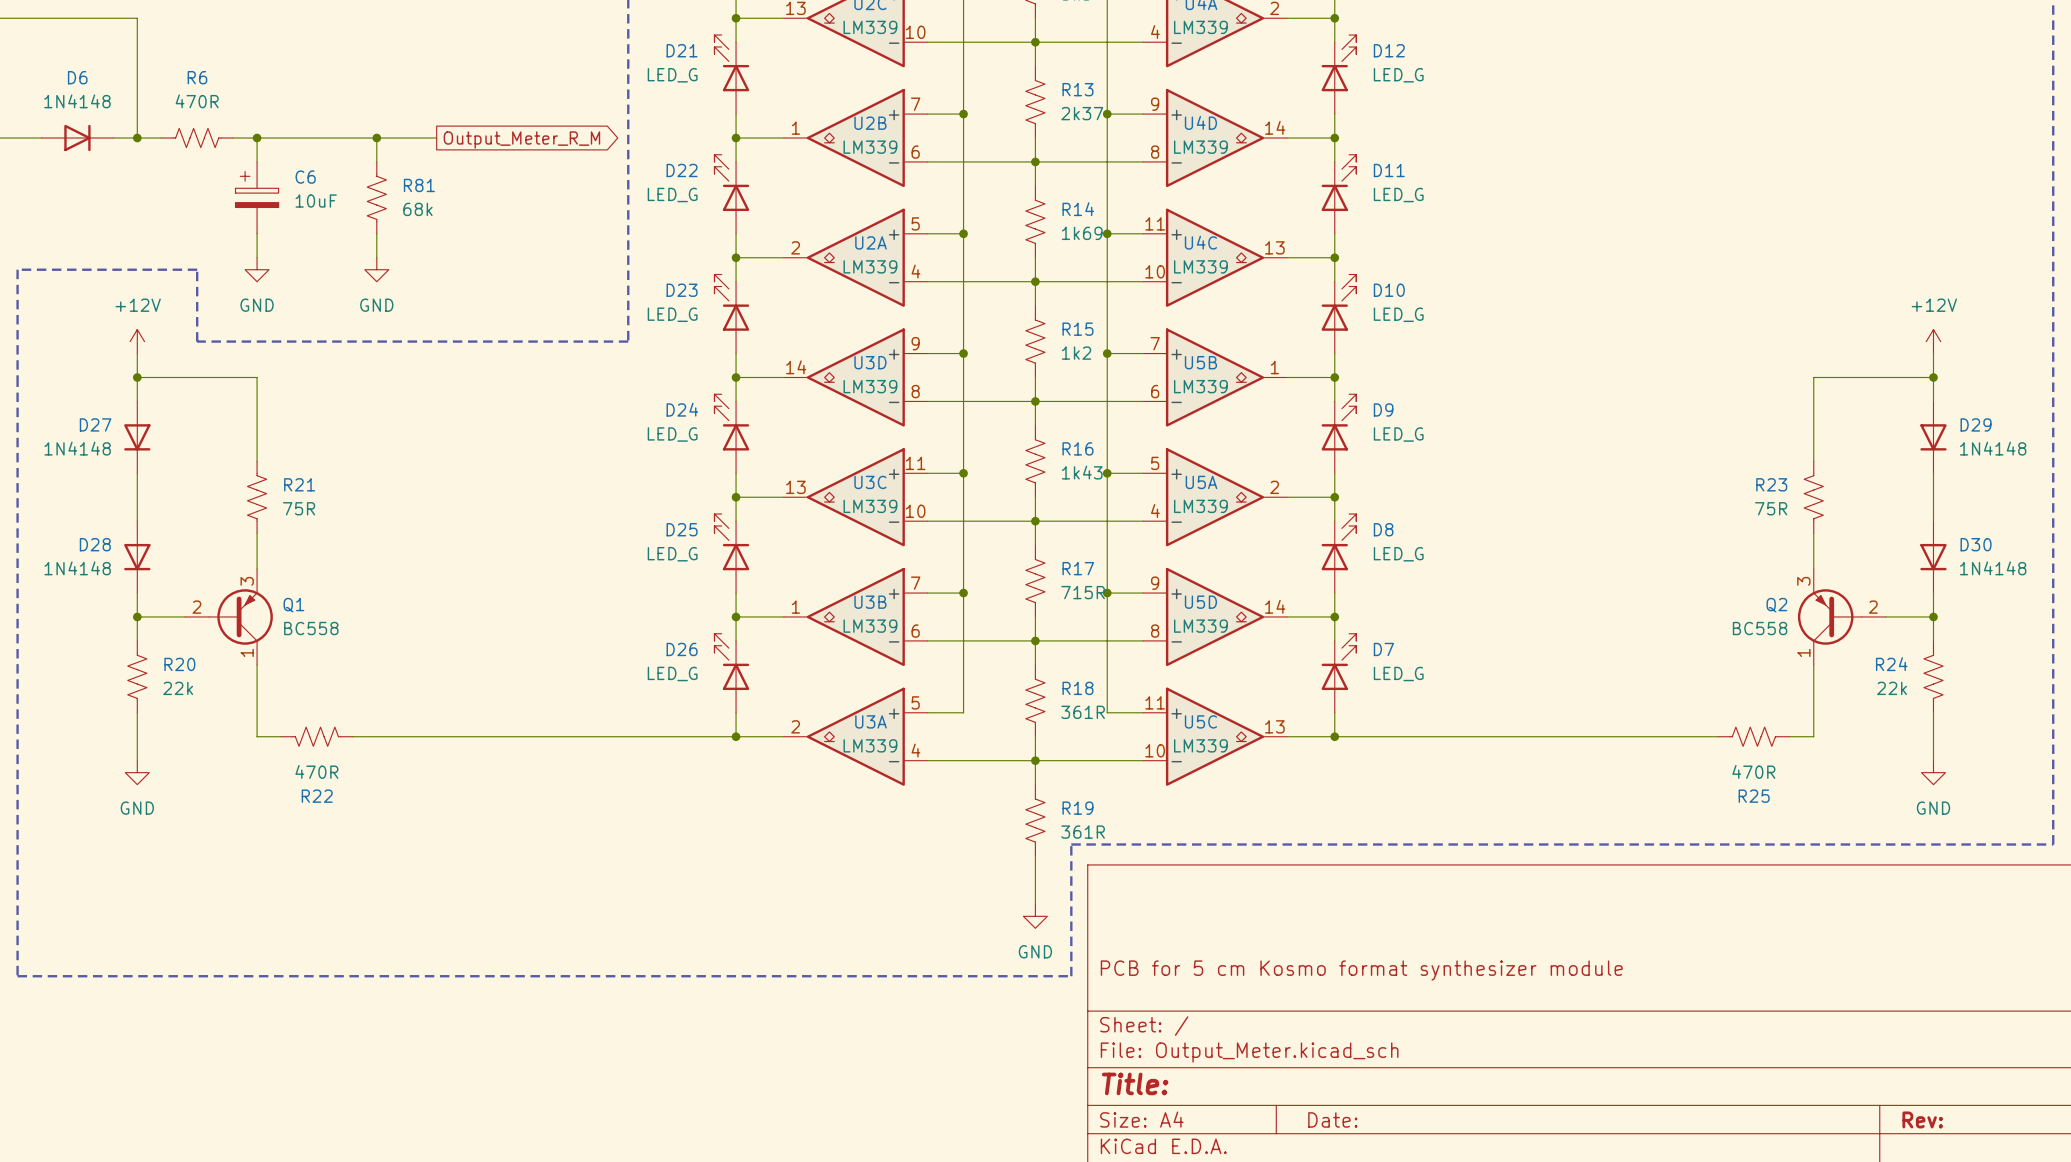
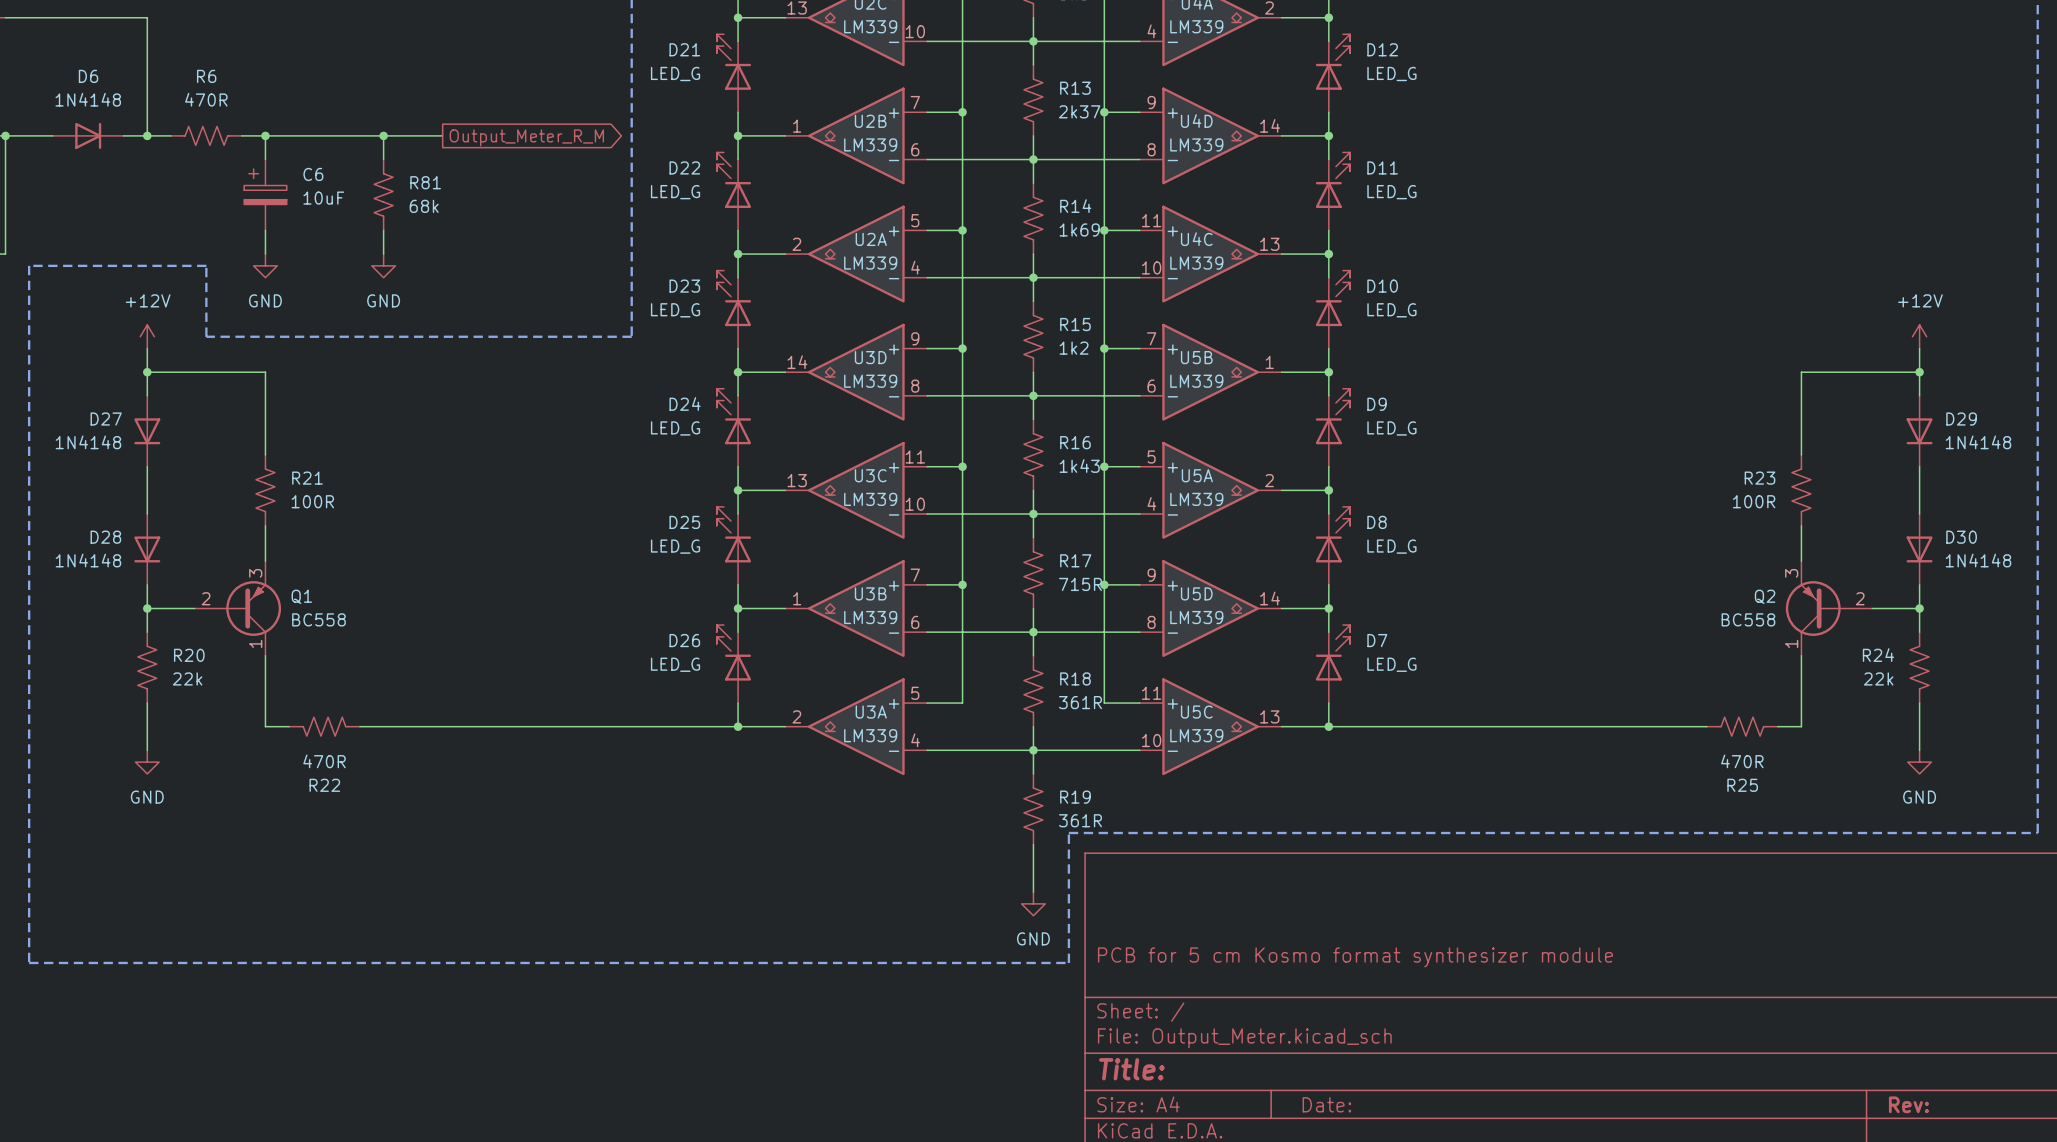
R21 value: 75R (299, 508) -> 100R (312, 501)
R23 value: 75R (1771, 508) -> 100R (1754, 501)

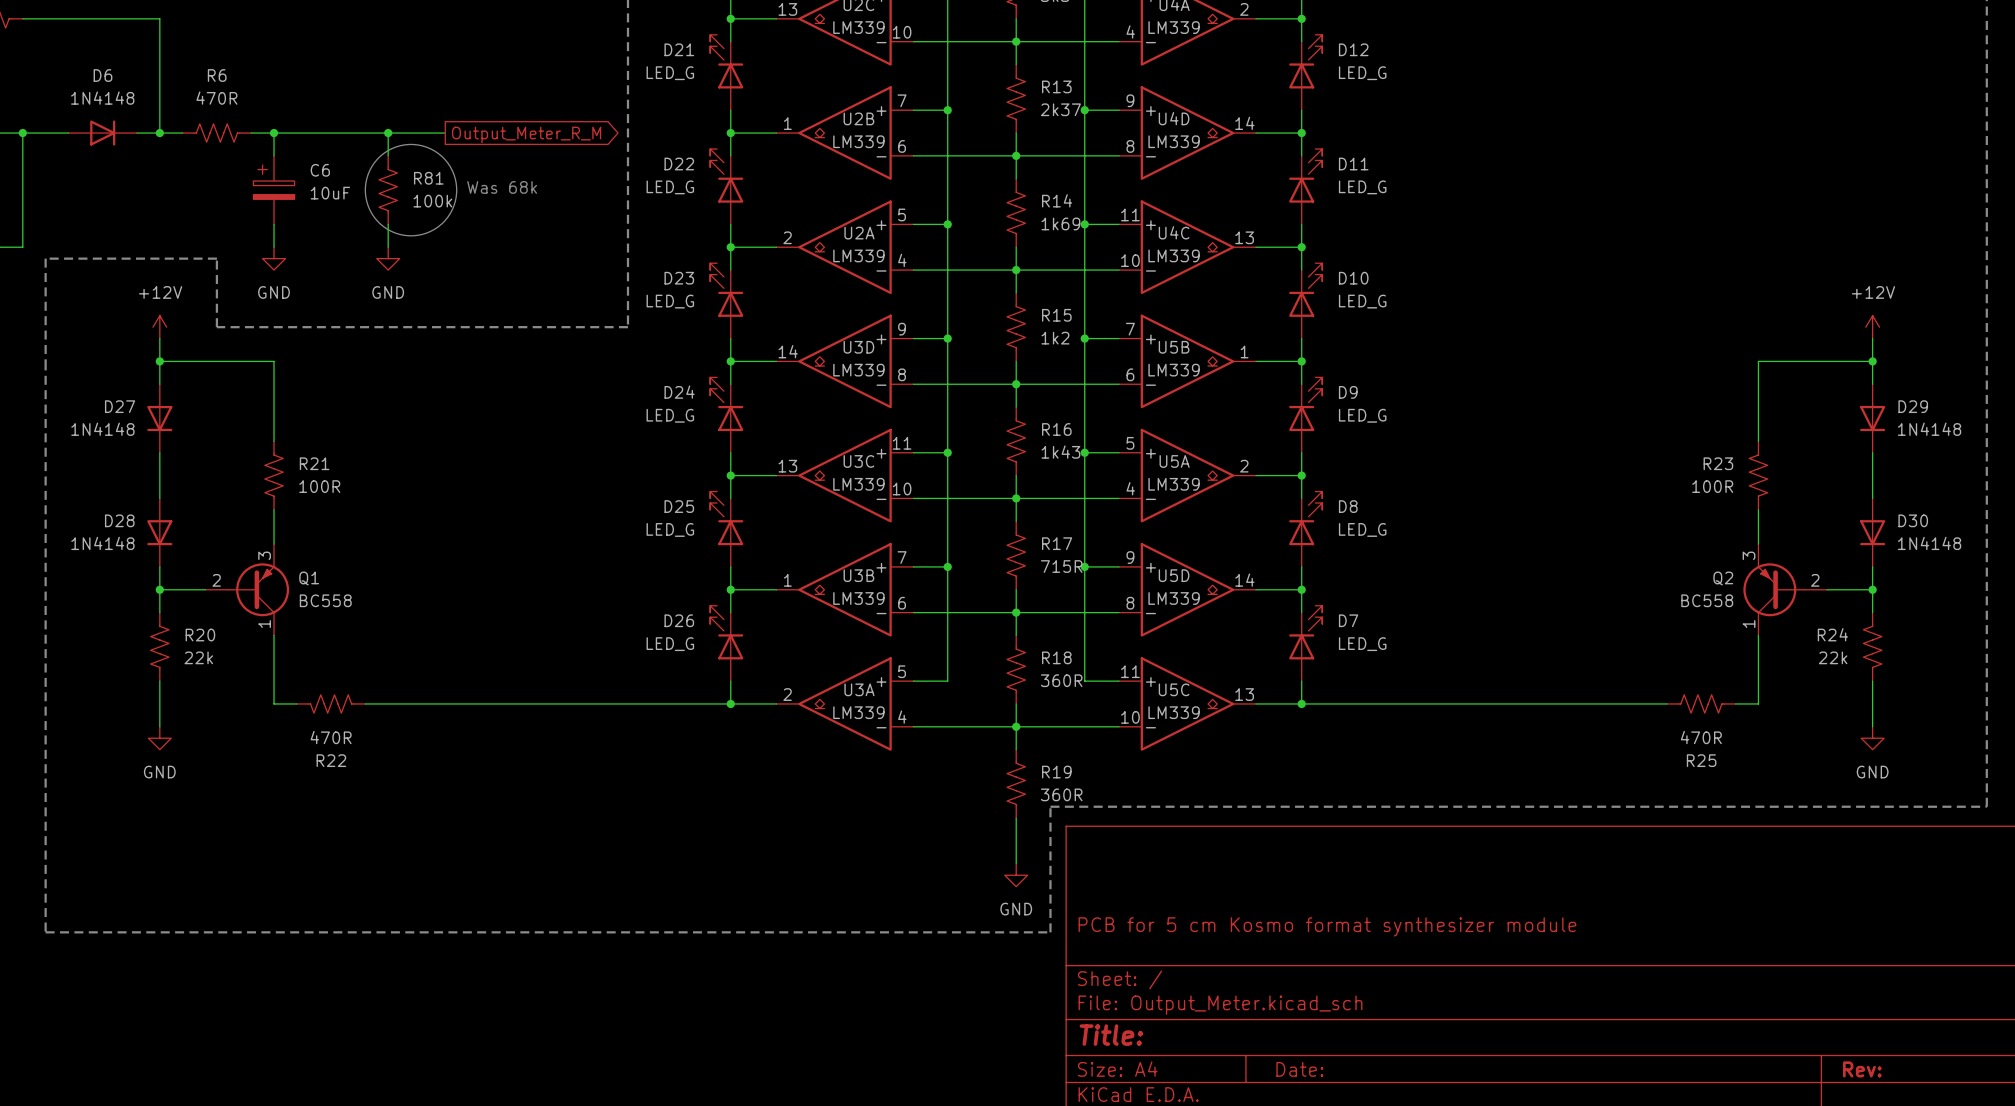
drawing: none -> [365, 144, 457, 236]
text: none -> Was 68k (502, 187)
R81 value: 68k (424, 206) -> 100k (432, 201)
R18 value: 361R (1080, 702) -> 360R (1061, 680)
R19 value: 361R (1080, 820) -> 360R (1061, 794)

